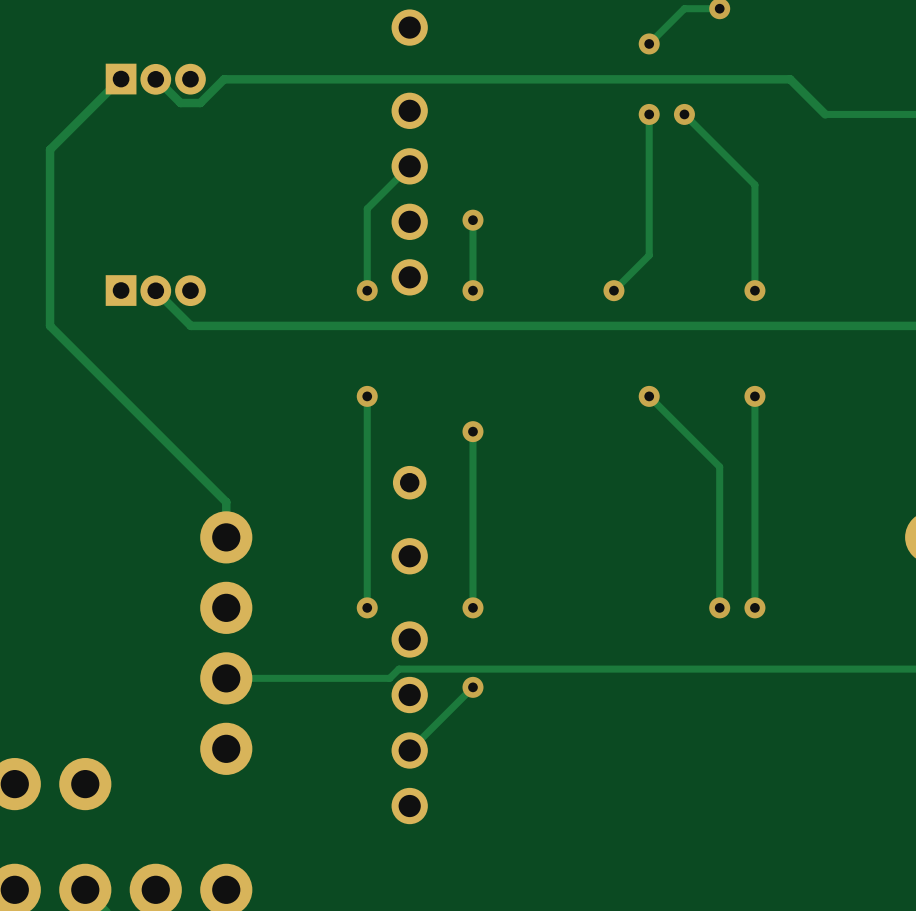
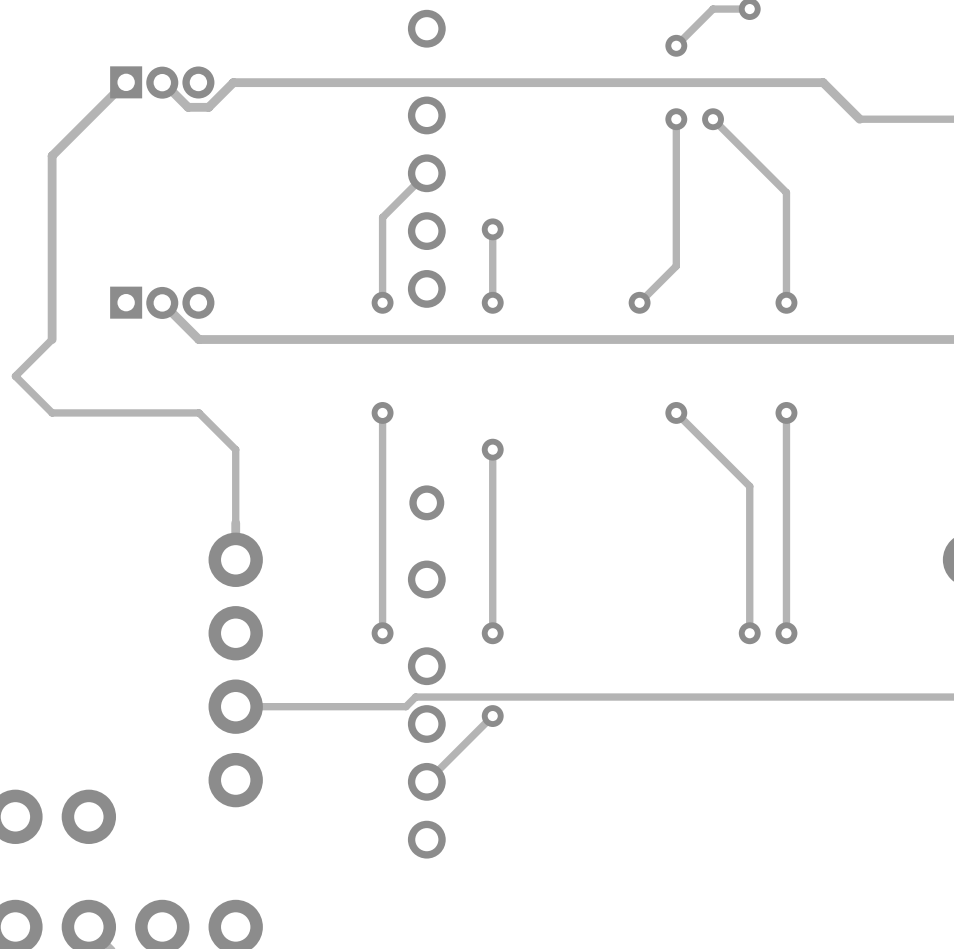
track: (50, 325) (226, 502) -> (52, 339) (15, 376) (52, 412) (199, 412) (235, 449) (235, 523)

